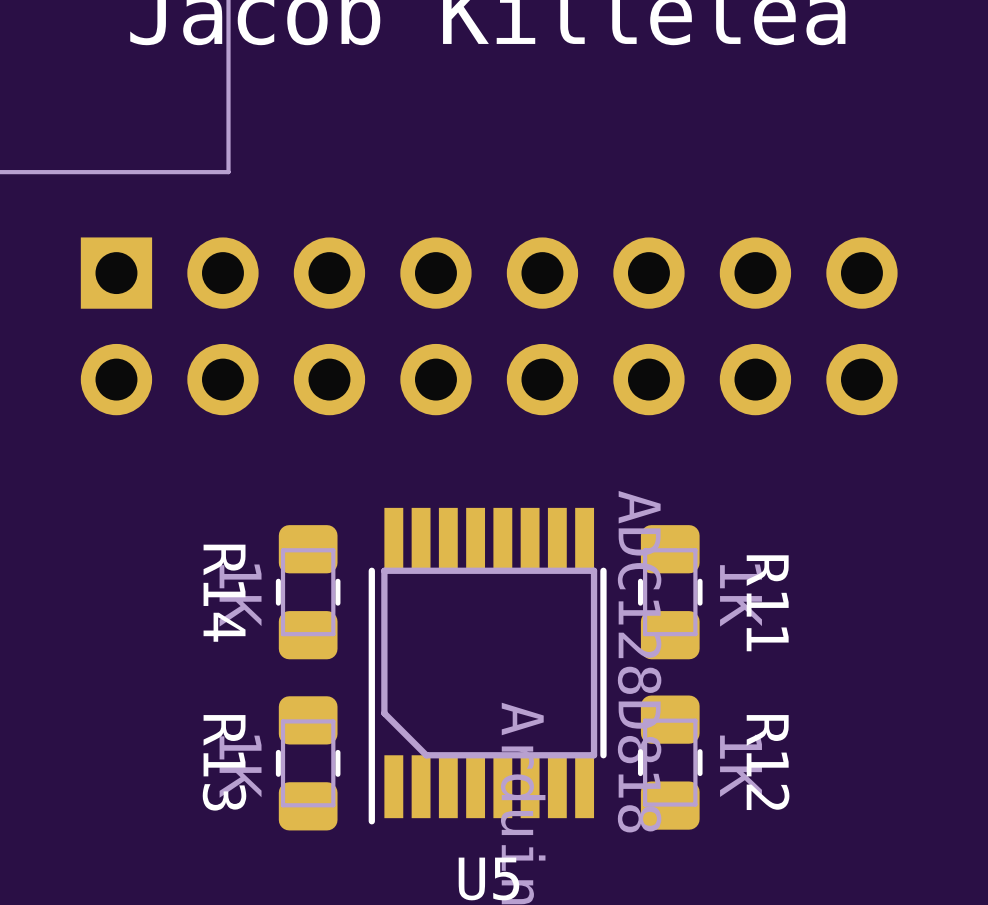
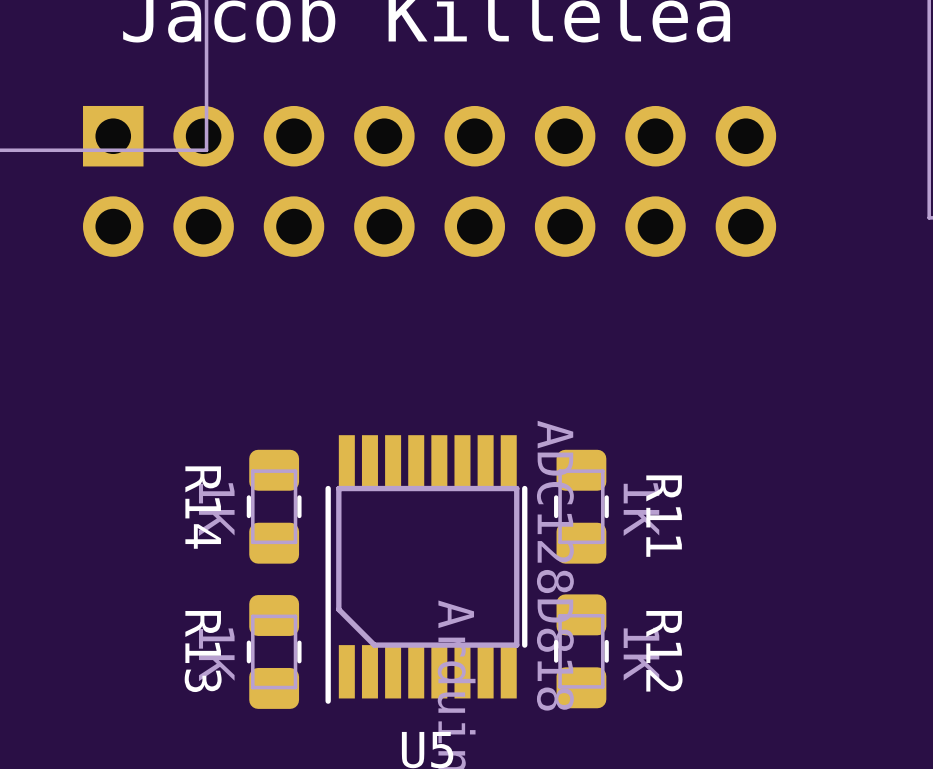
part position: (489, 326) -> (429, 181)

